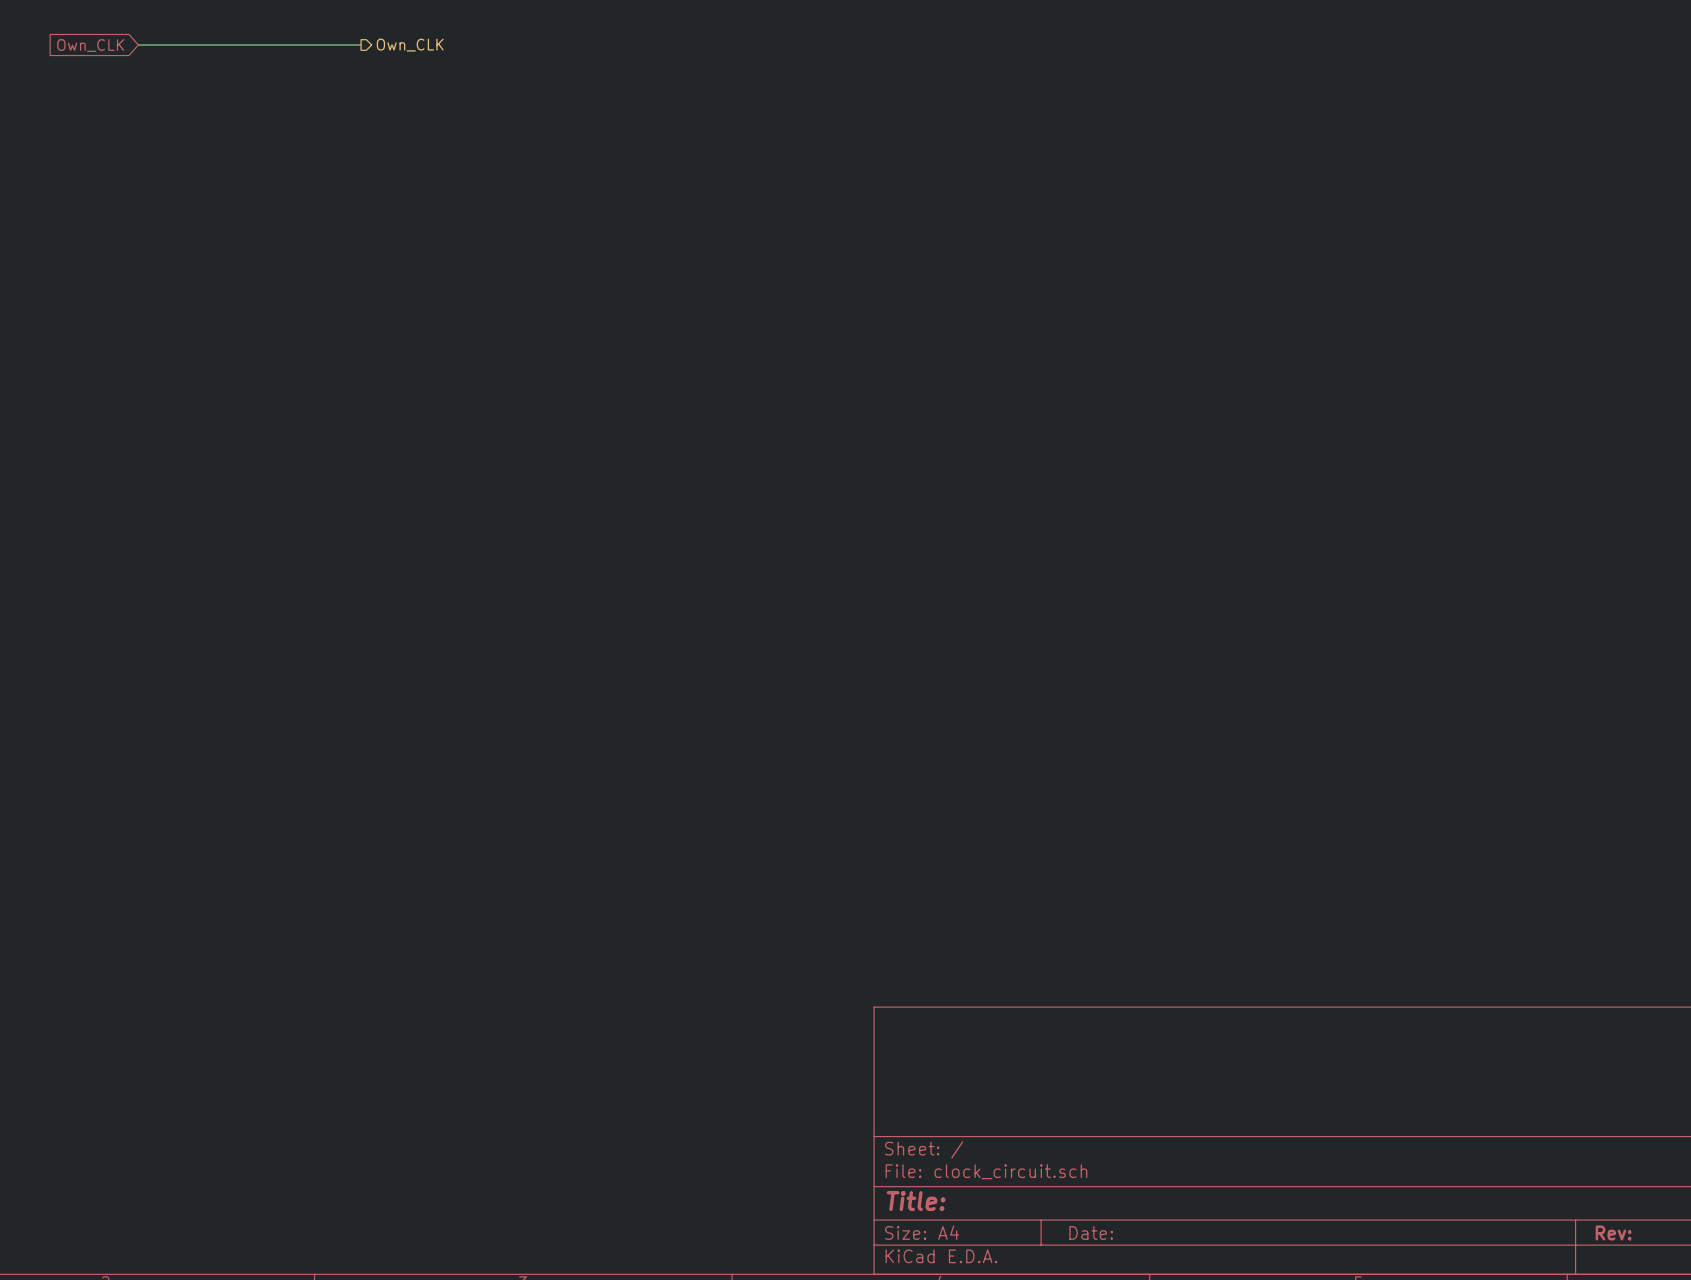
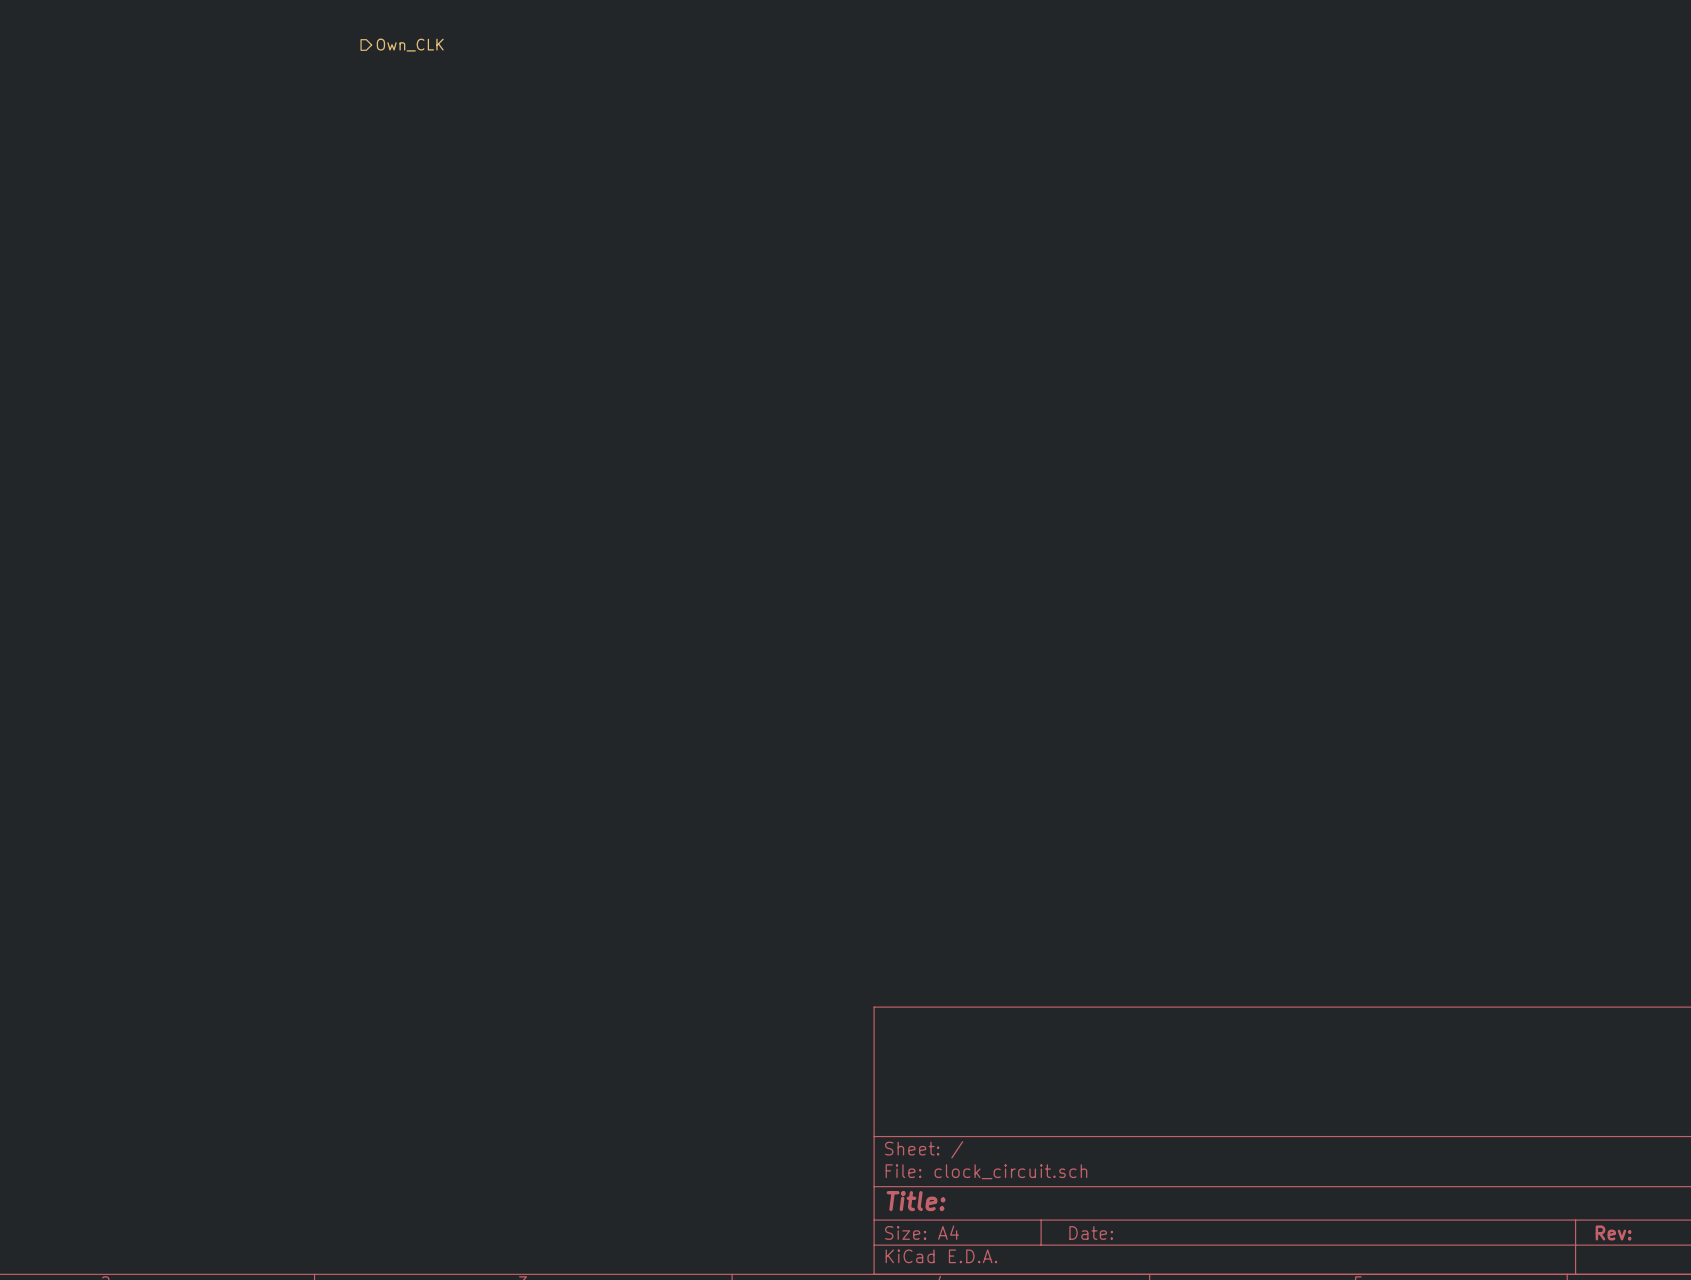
wire: (138, 44) (361, 44) -> none
global label: Own_CLK (90, 45) -> none

